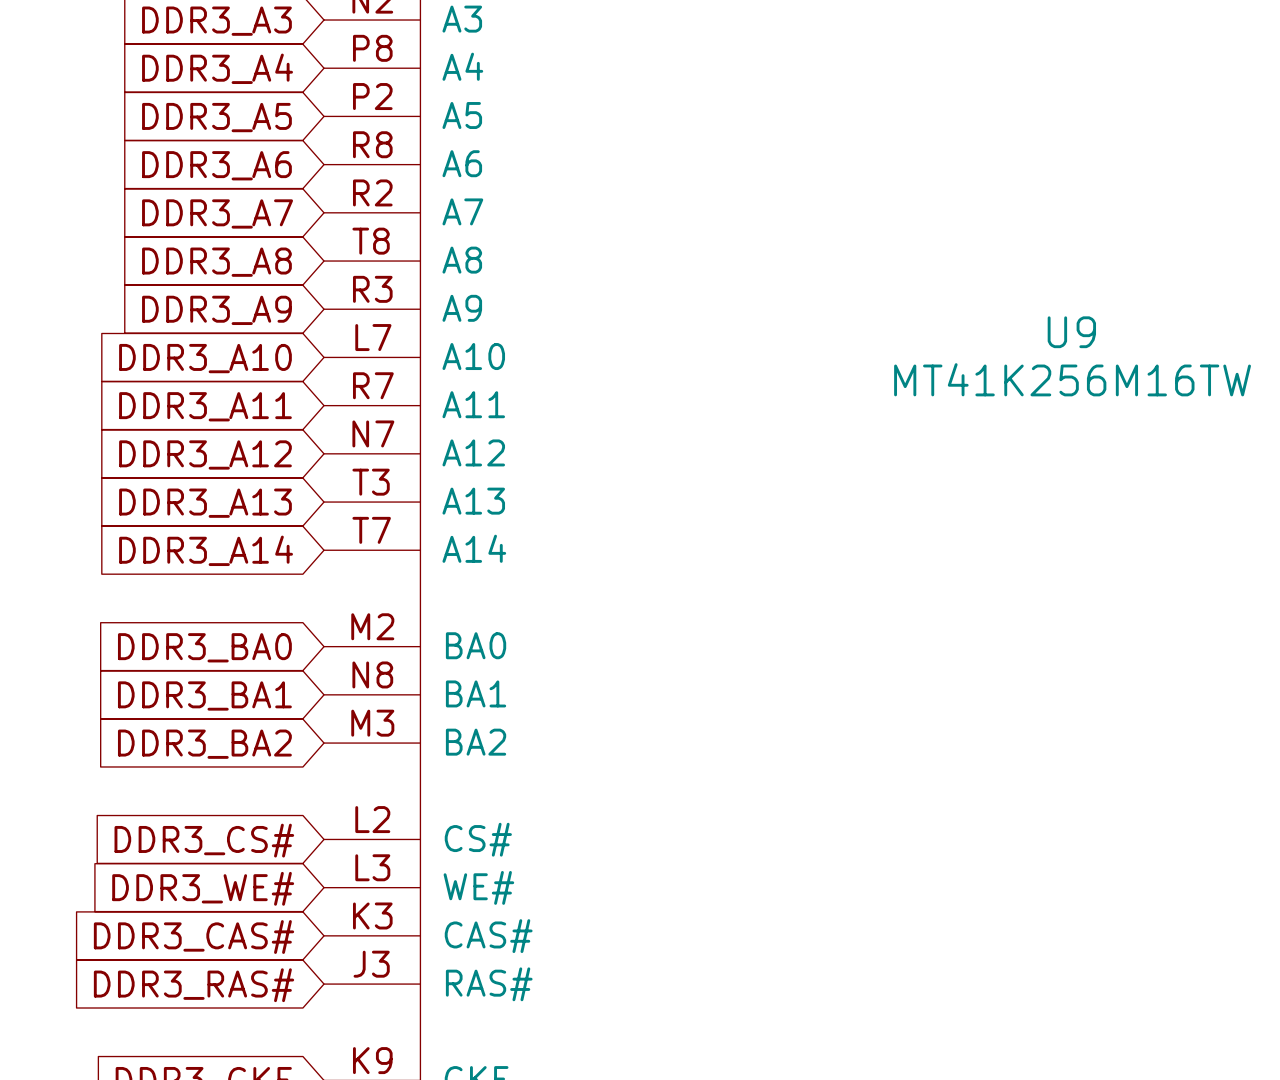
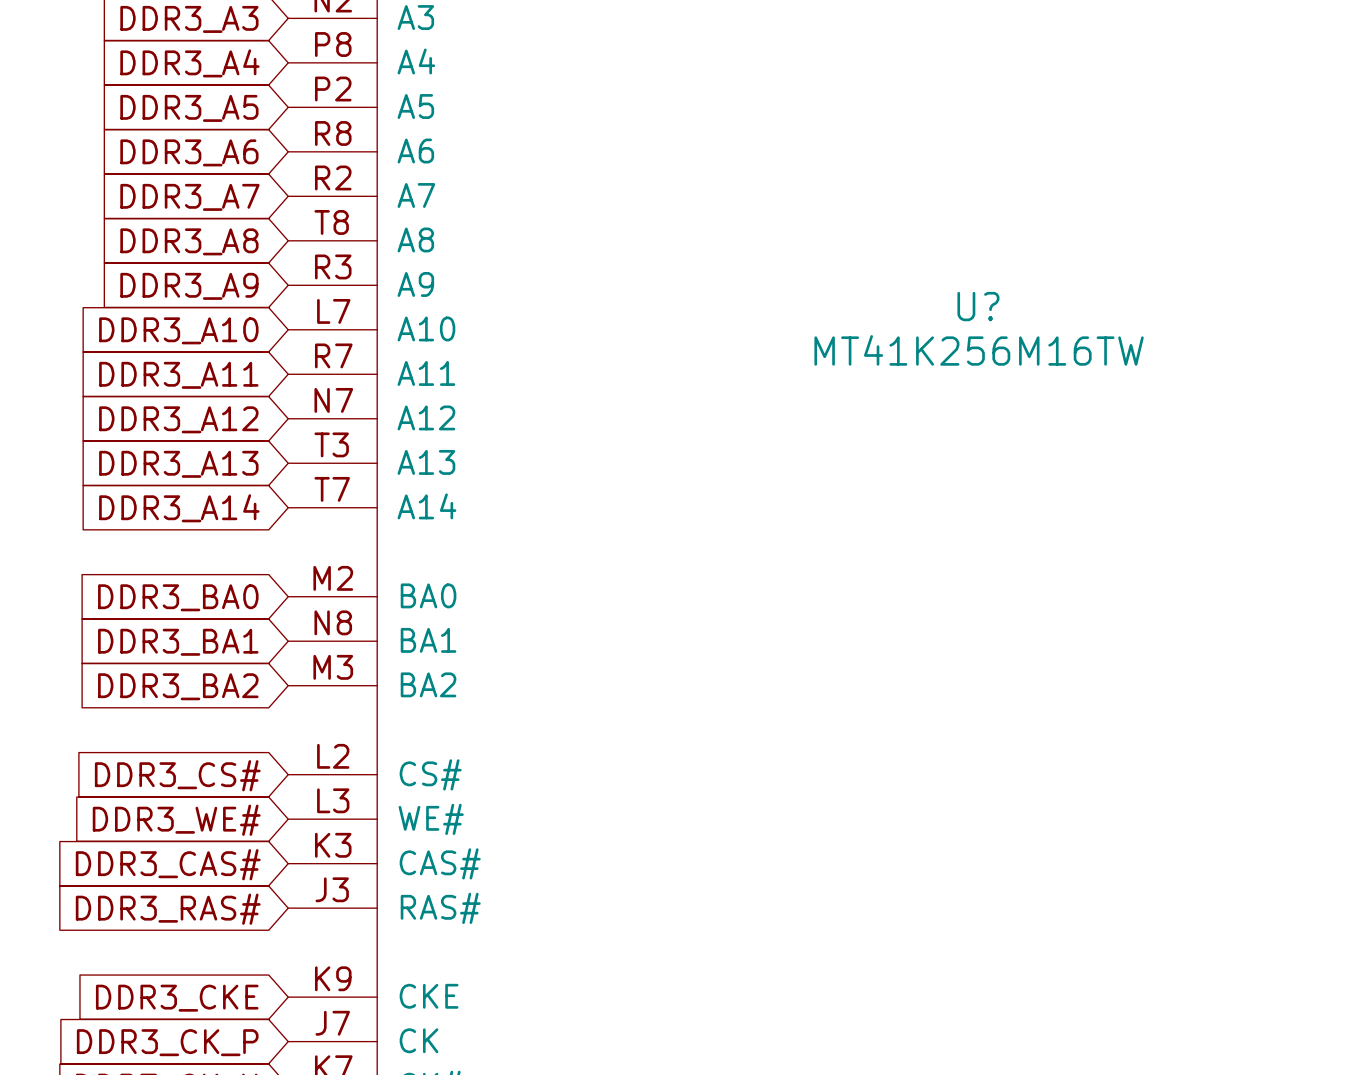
U9 name: U9 (1071, 332) -> U? (978, 306)

